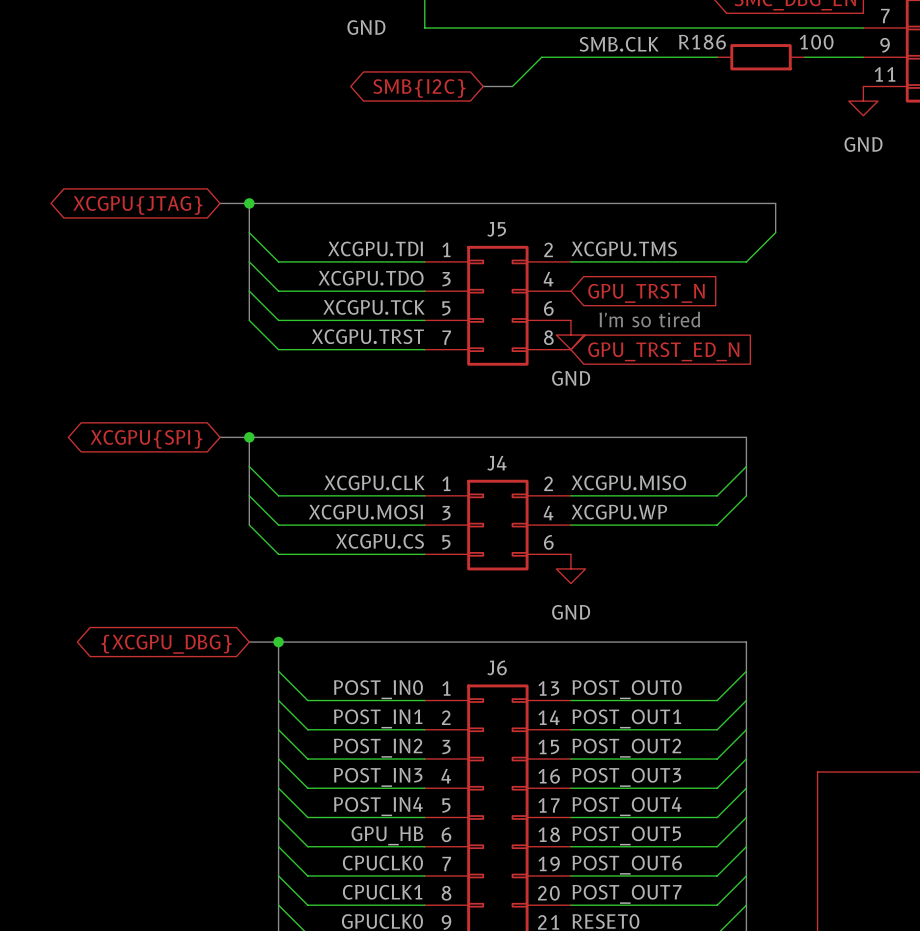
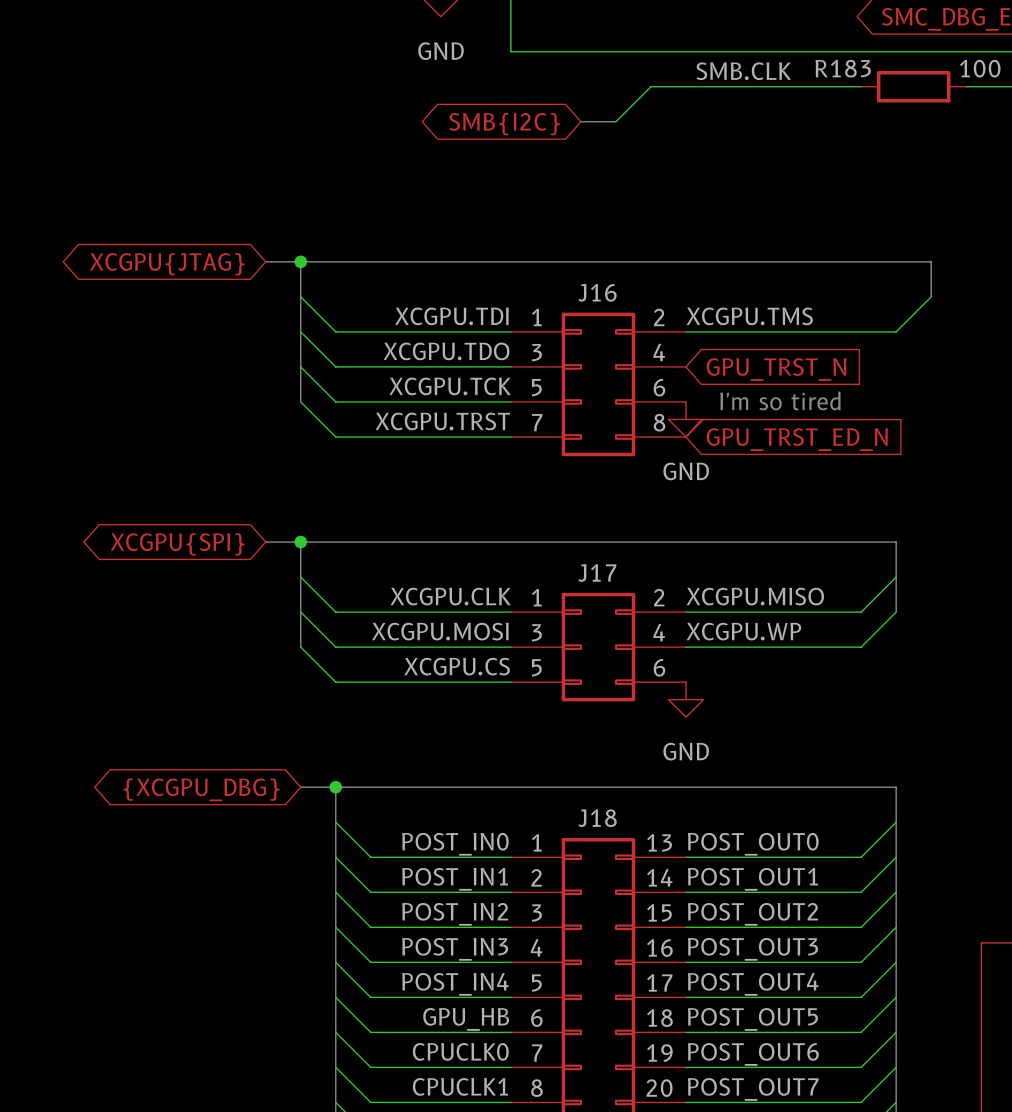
R186 name: R186 (702, 42) -> R183 (843, 68)
J5 name: J5 (496, 229) -> J16 (597, 292)
J4 name: J4 (496, 463) -> J17 (597, 573)
J6 name: J6 (497, 667) -> J18 (597, 818)

